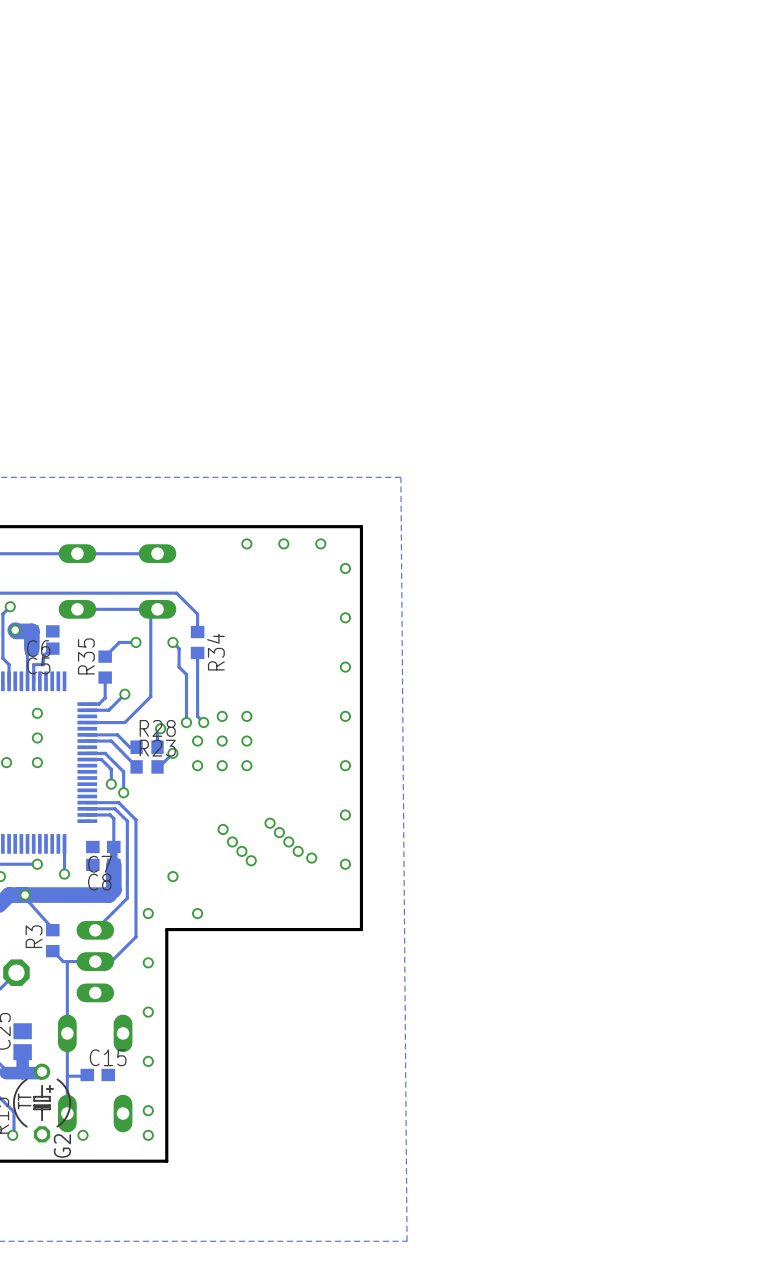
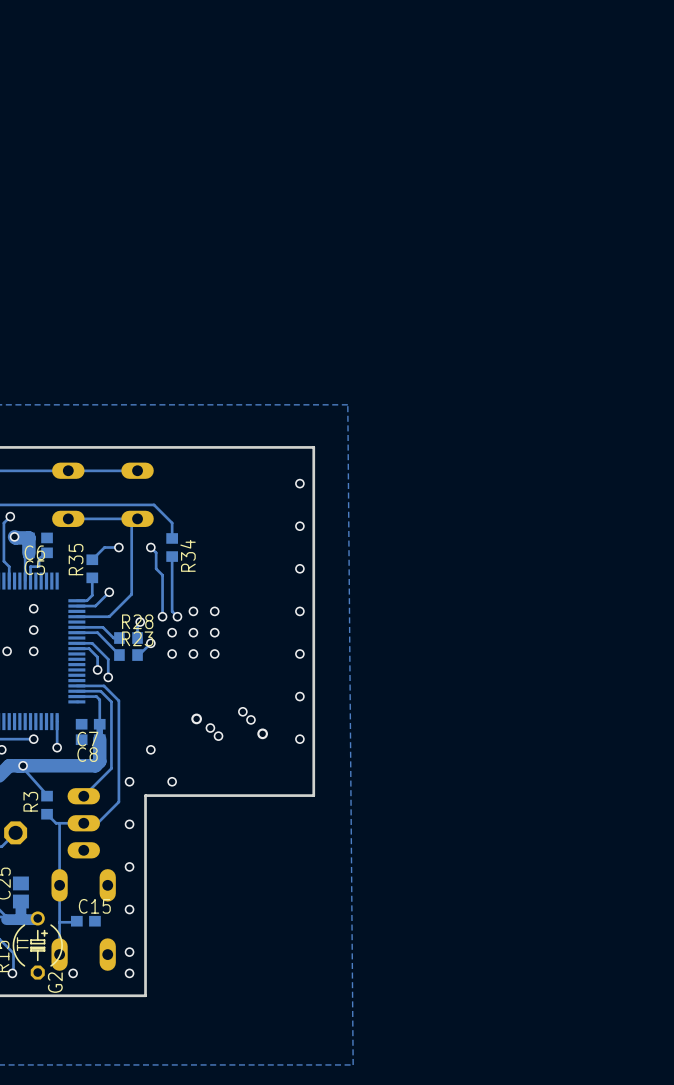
via: (246, 543) -> none
via: (283, 543) -> none
via: (320, 543) -> none
via: (270, 823) -> none
via: (223, 829) -> none
via: none -> (196, 718)
via: (232, 841) -> none
via: (298, 851) -> none
via: none -> (262, 733)
via: (311, 858) -> none

